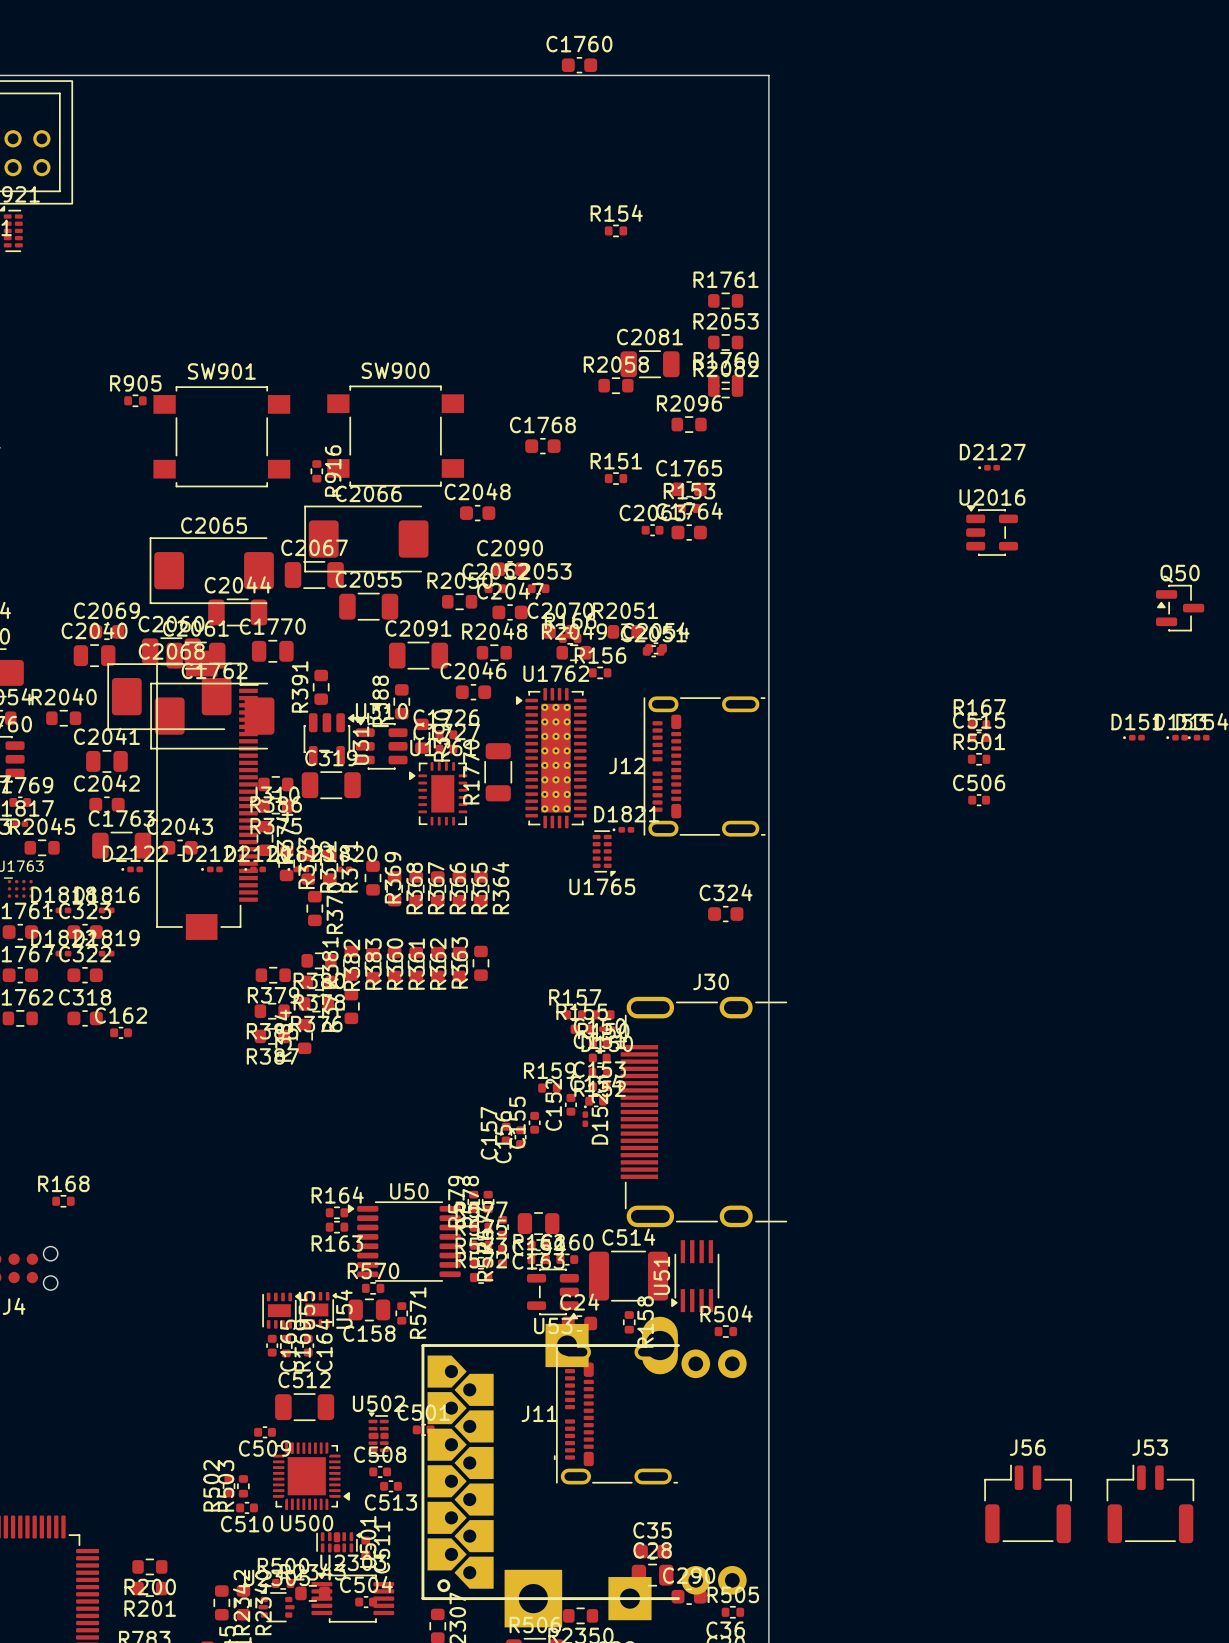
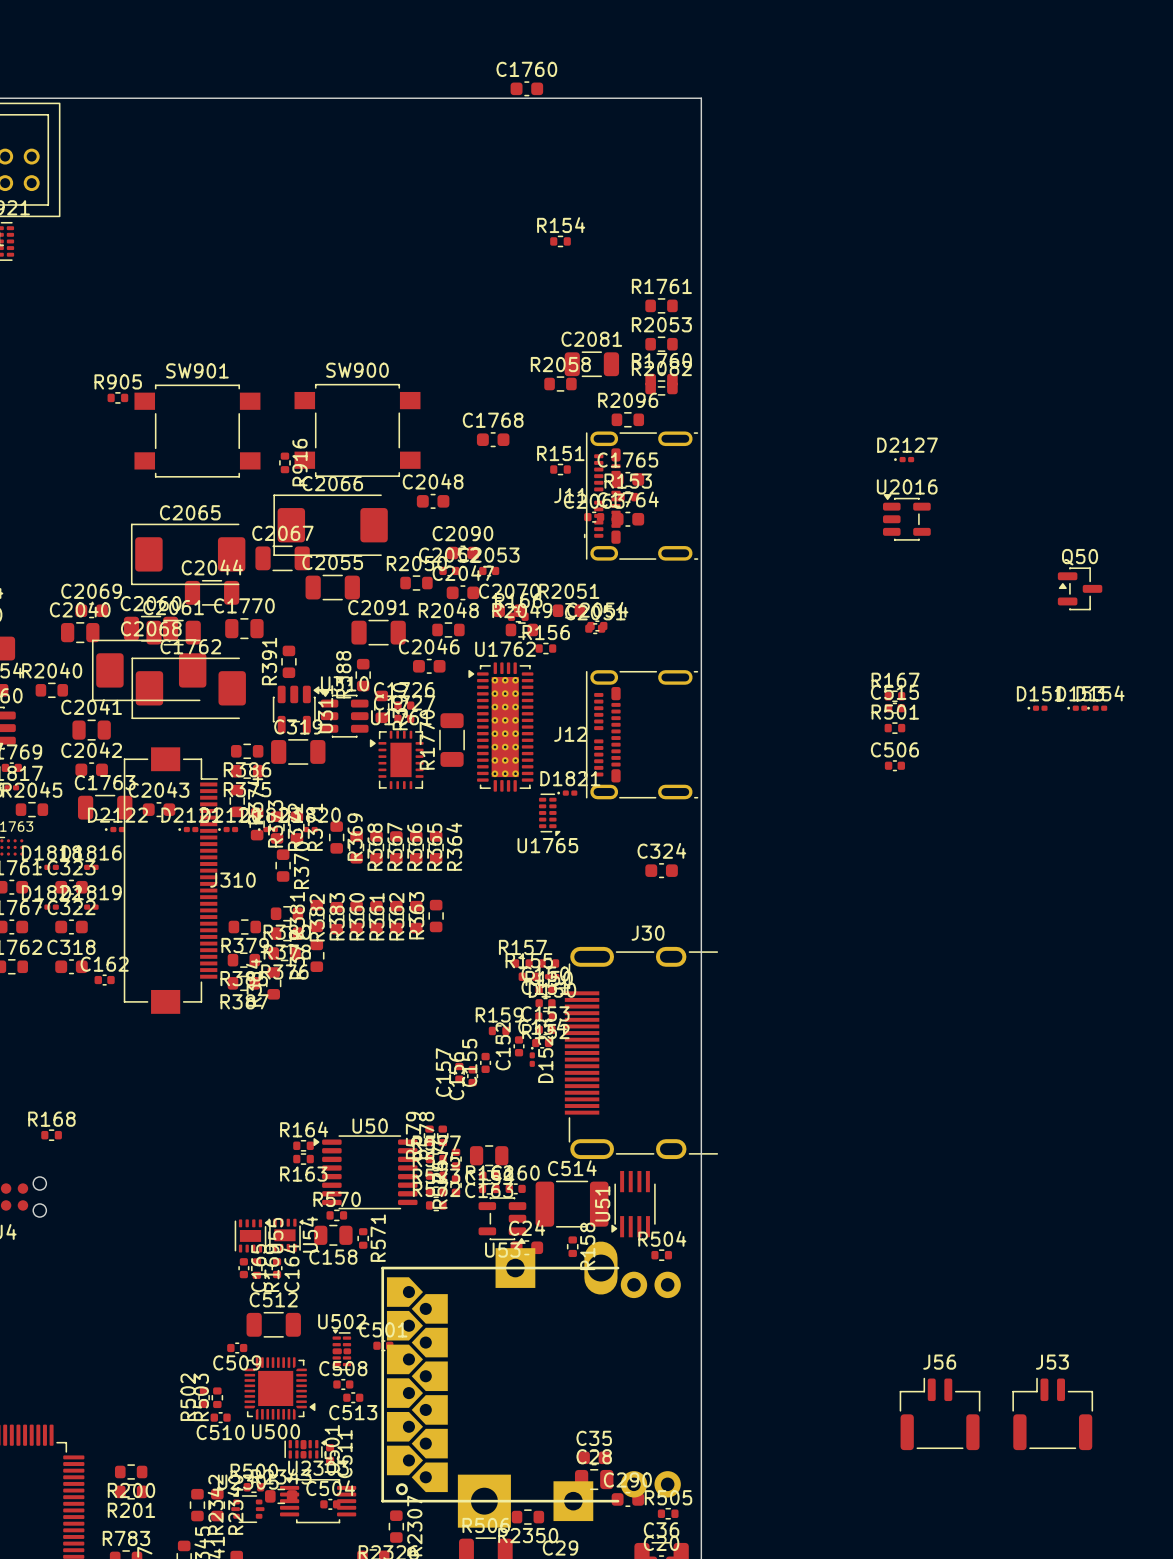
J310 position: (207, 795) -> (170, 880)
J11 position: (616, 1414) -> (641, 496)

